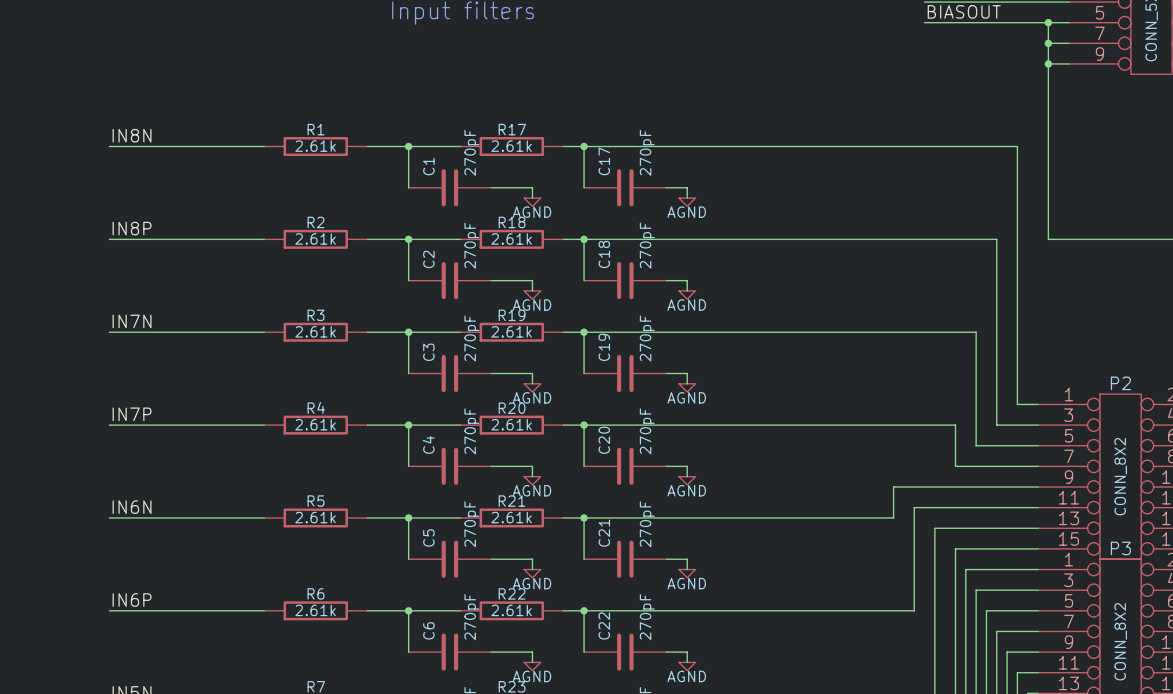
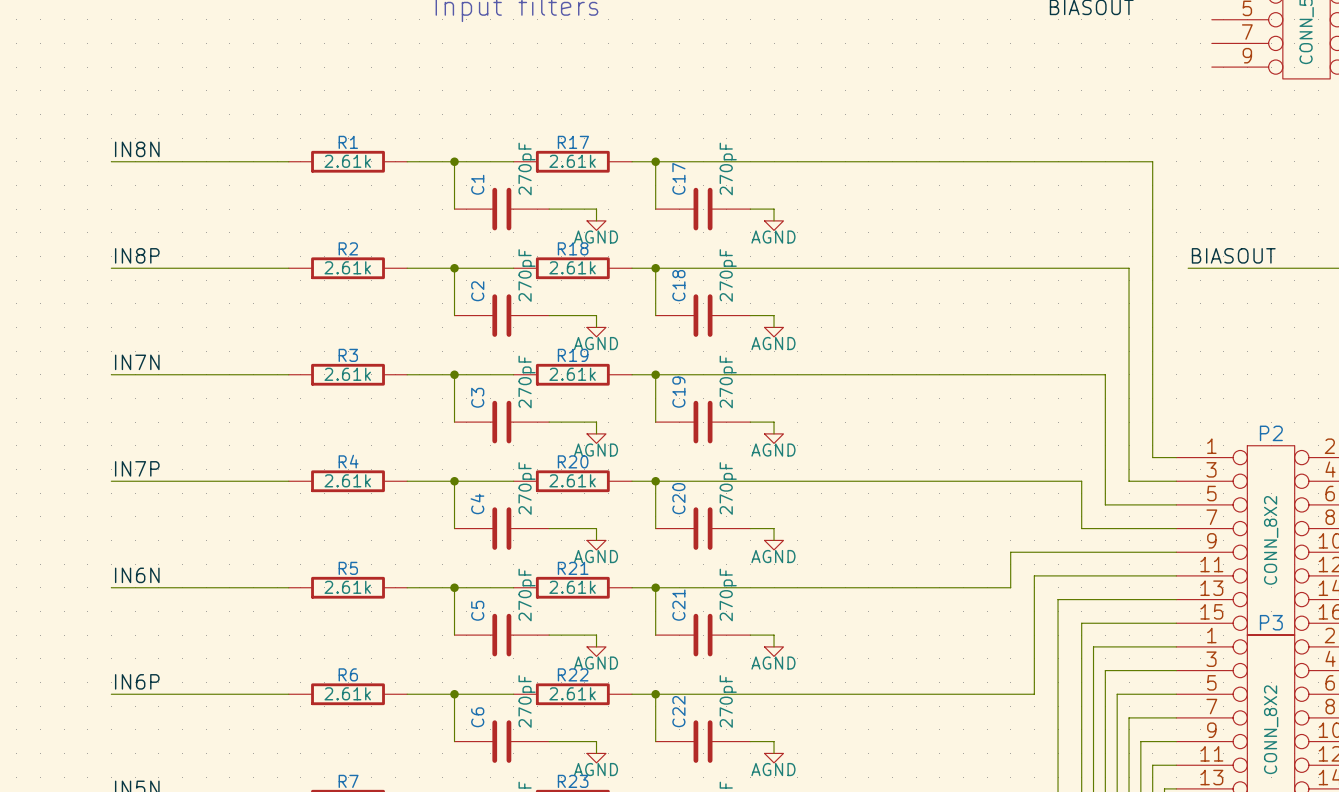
wire: (924, 22) (1069, 22) -> none
wire: (1048, 22) (1048, 239) -> none
junction: (1048, 22) -> none
wire: (1048, 43) (1069, 43) -> none
junction: (1048, 43) -> none
wire: (1048, 63) (1069, 63) -> none
junction: (1048, 63) -> none
label: none -> BIASOUT (1233, 255)

